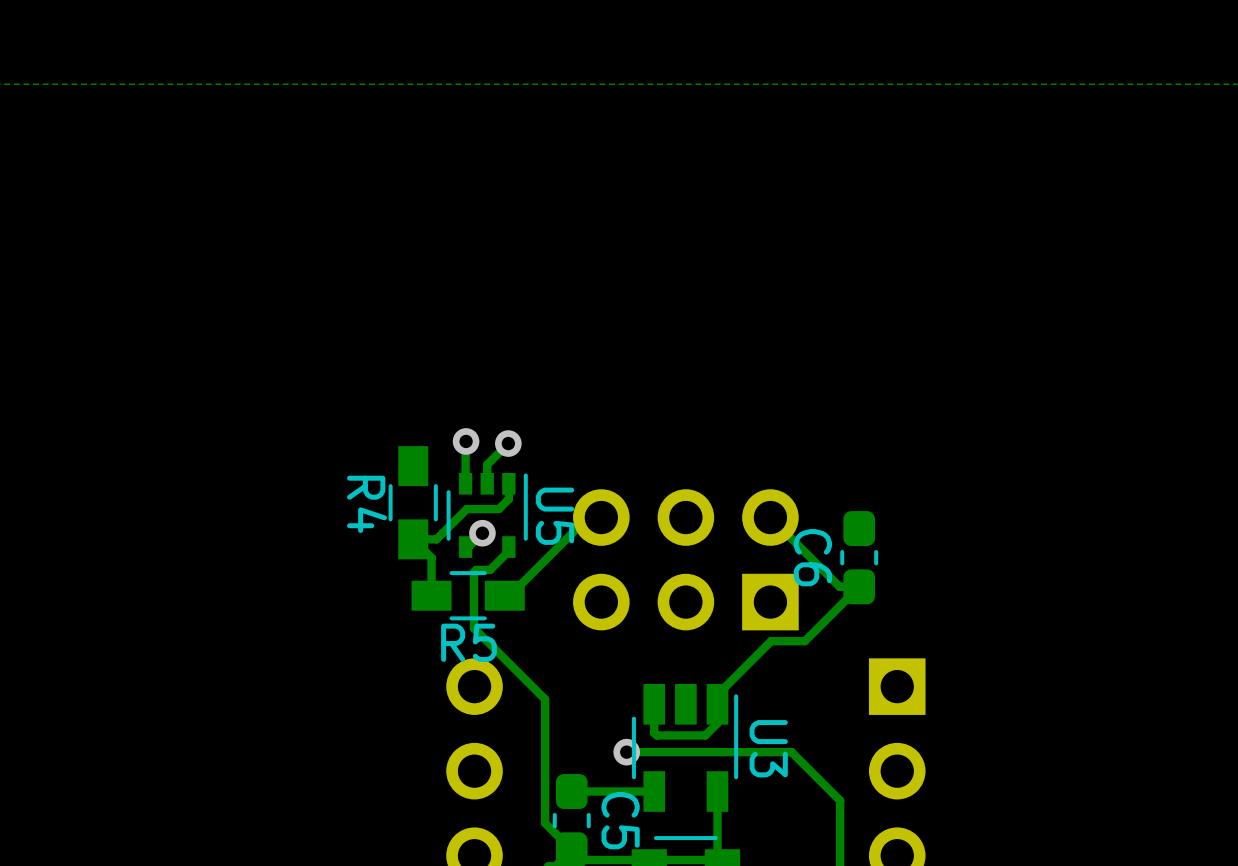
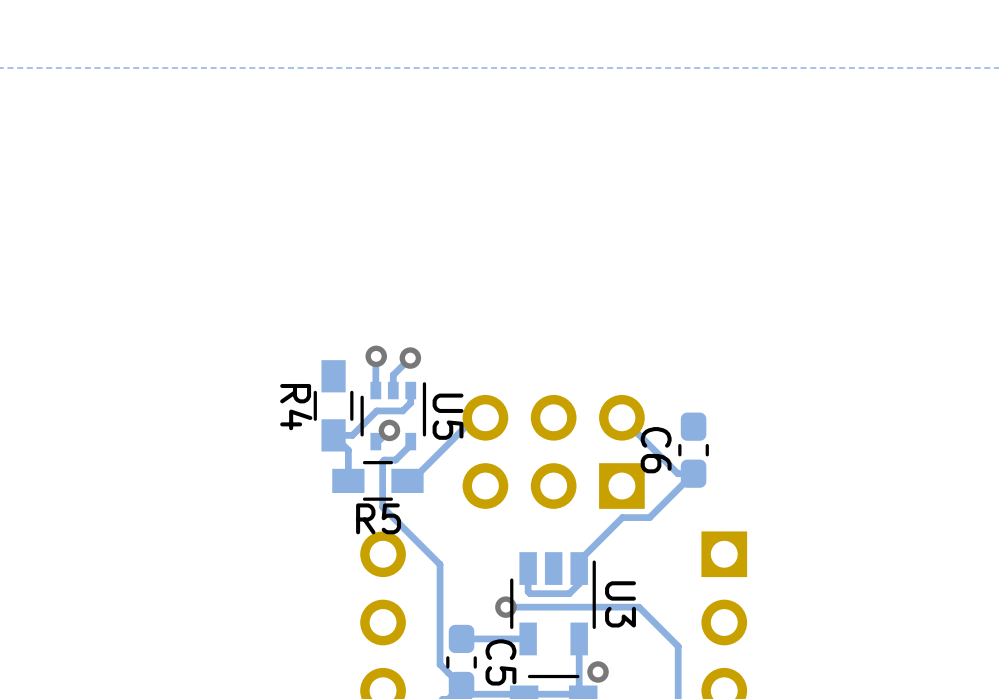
via: none -> (598, 671)

